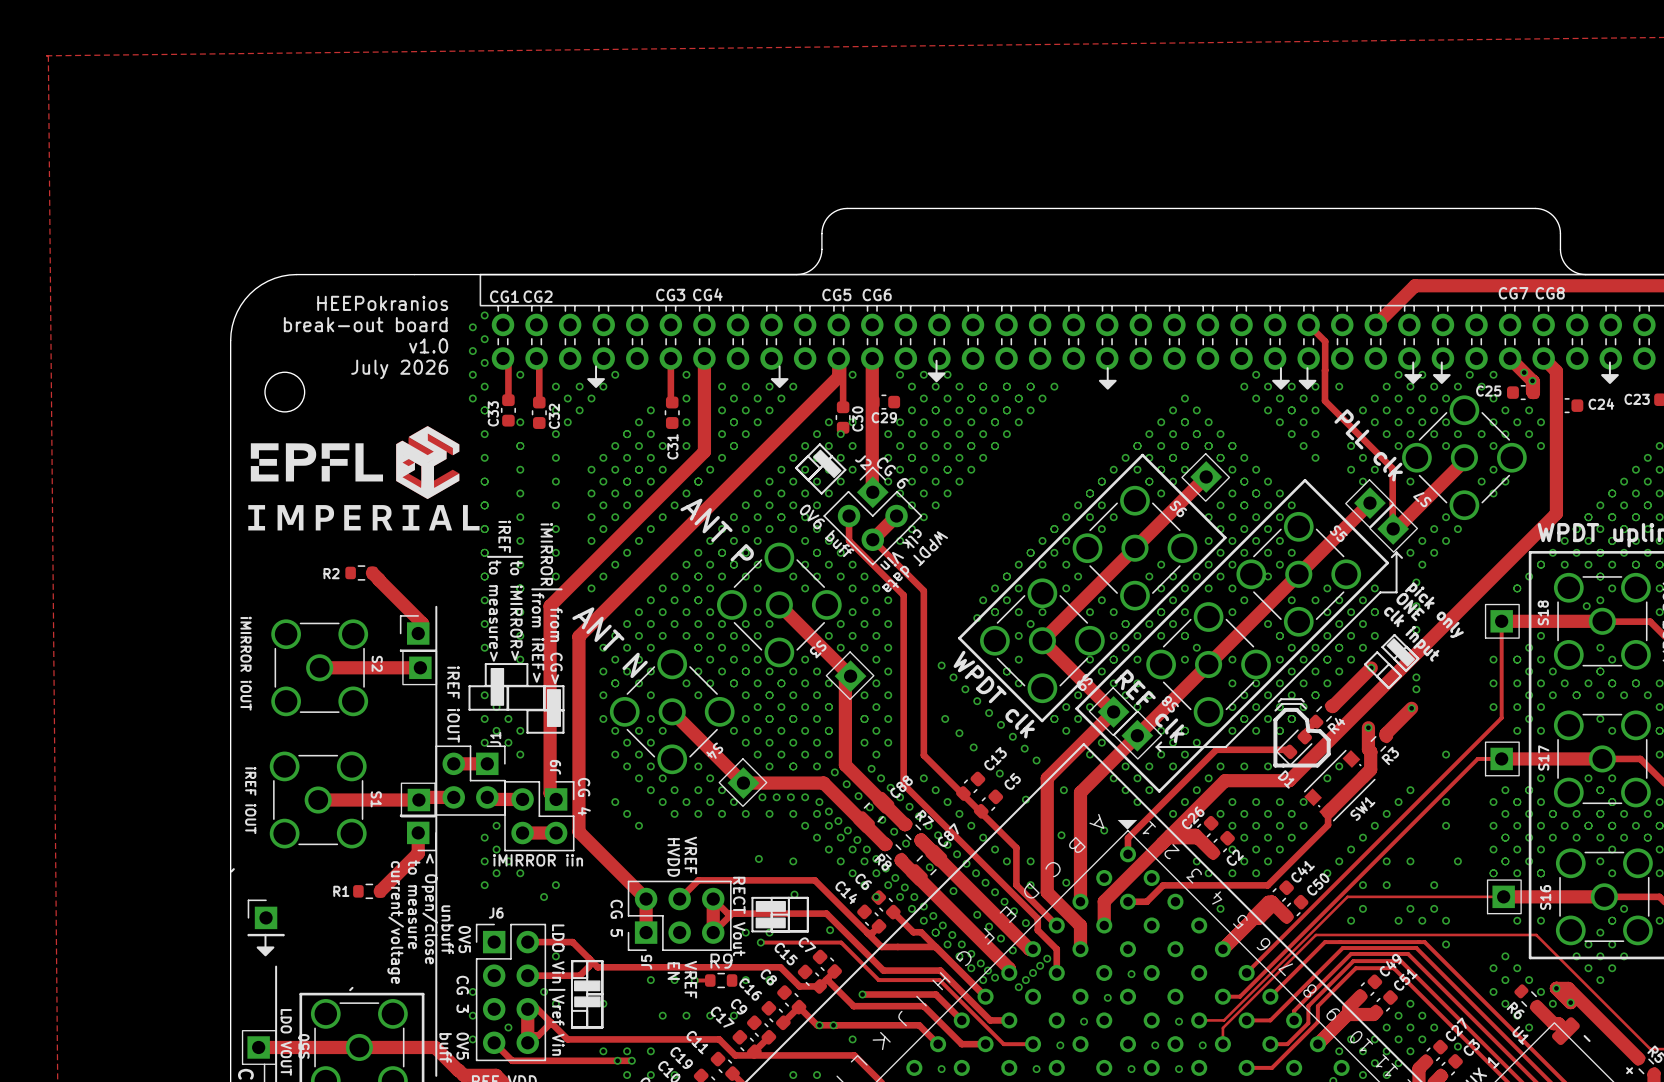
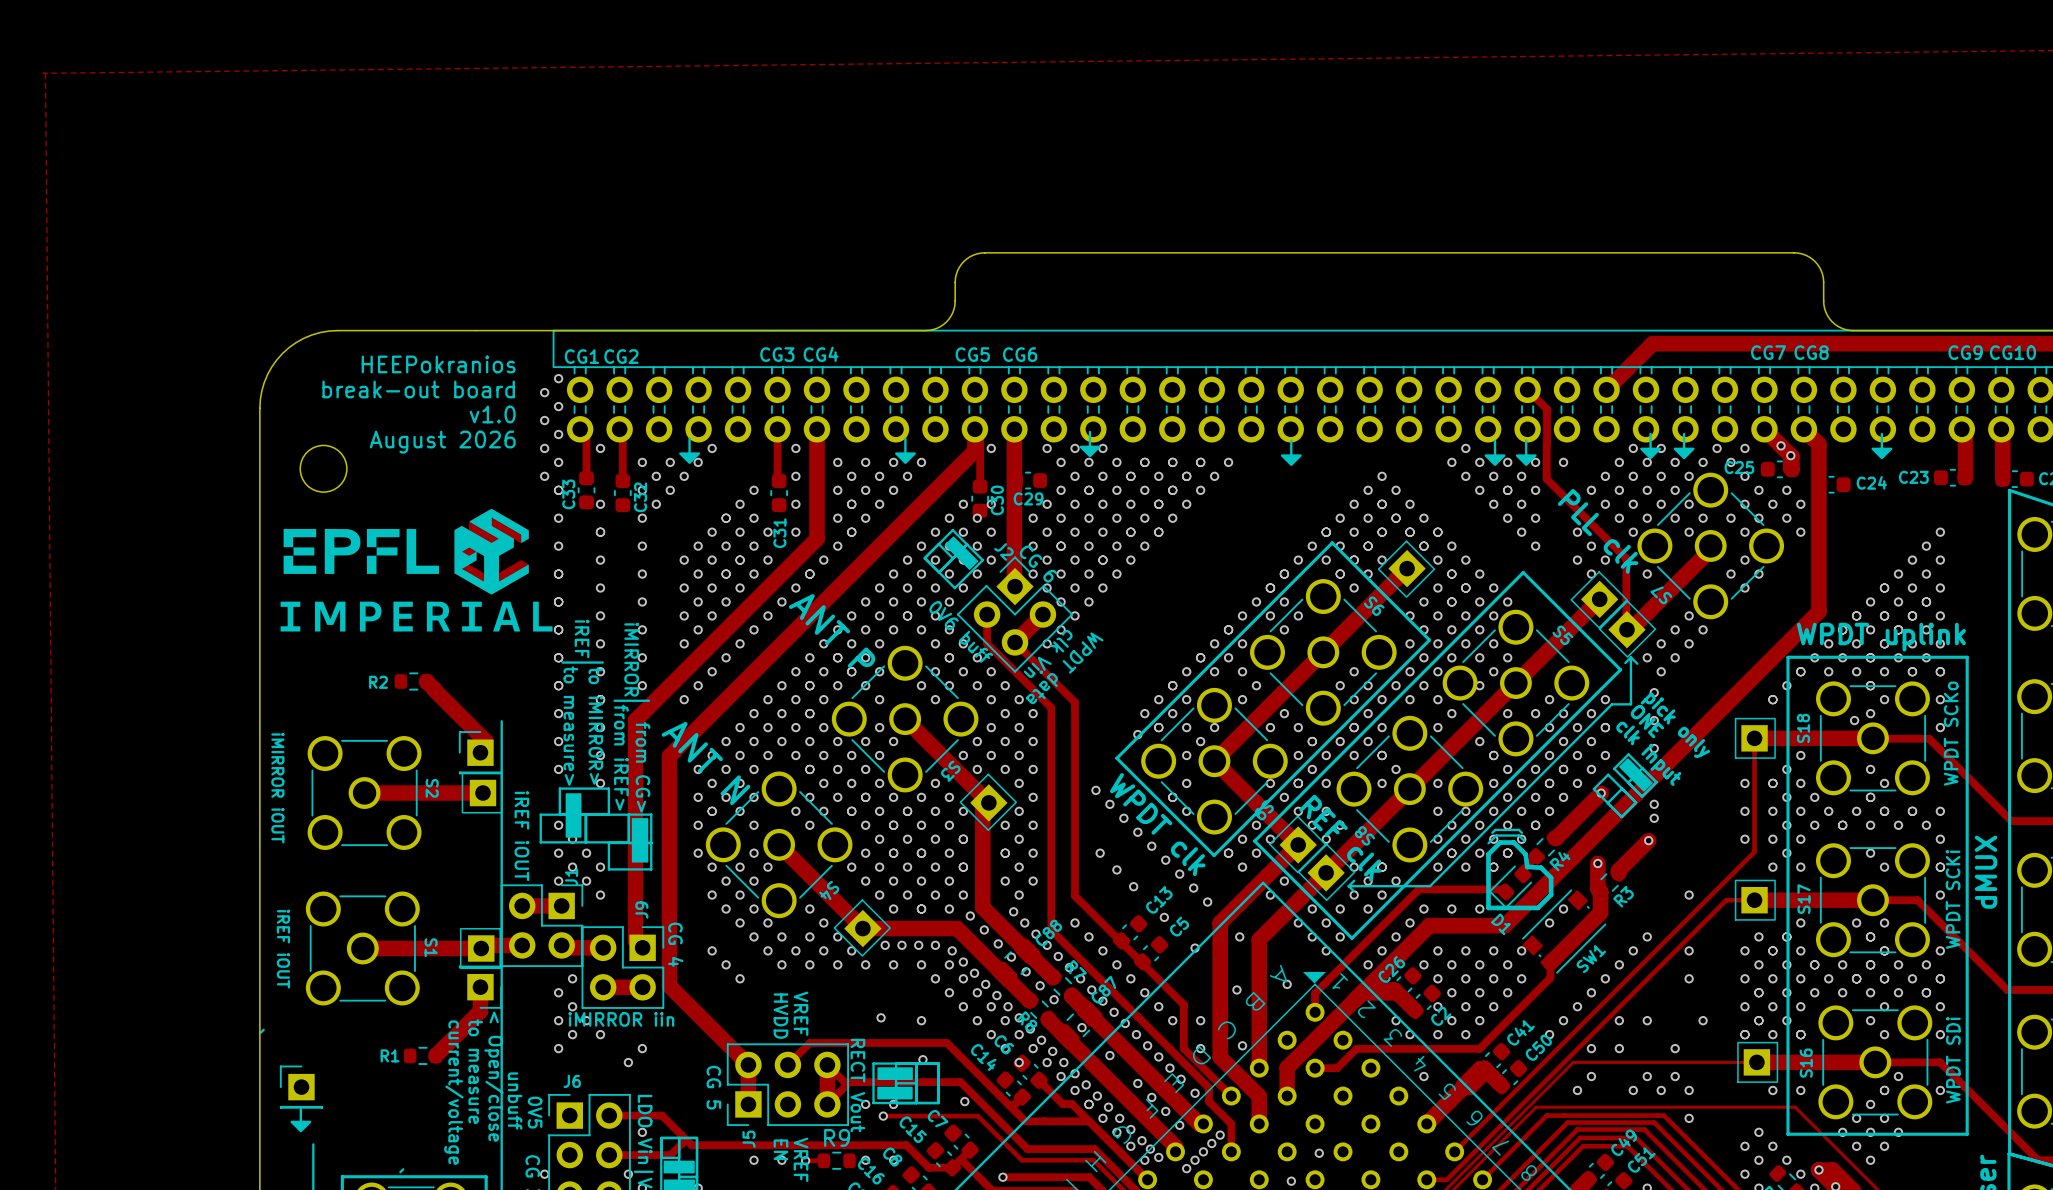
text: July 2026 (399, 369) -> August 2026 (442, 442)

